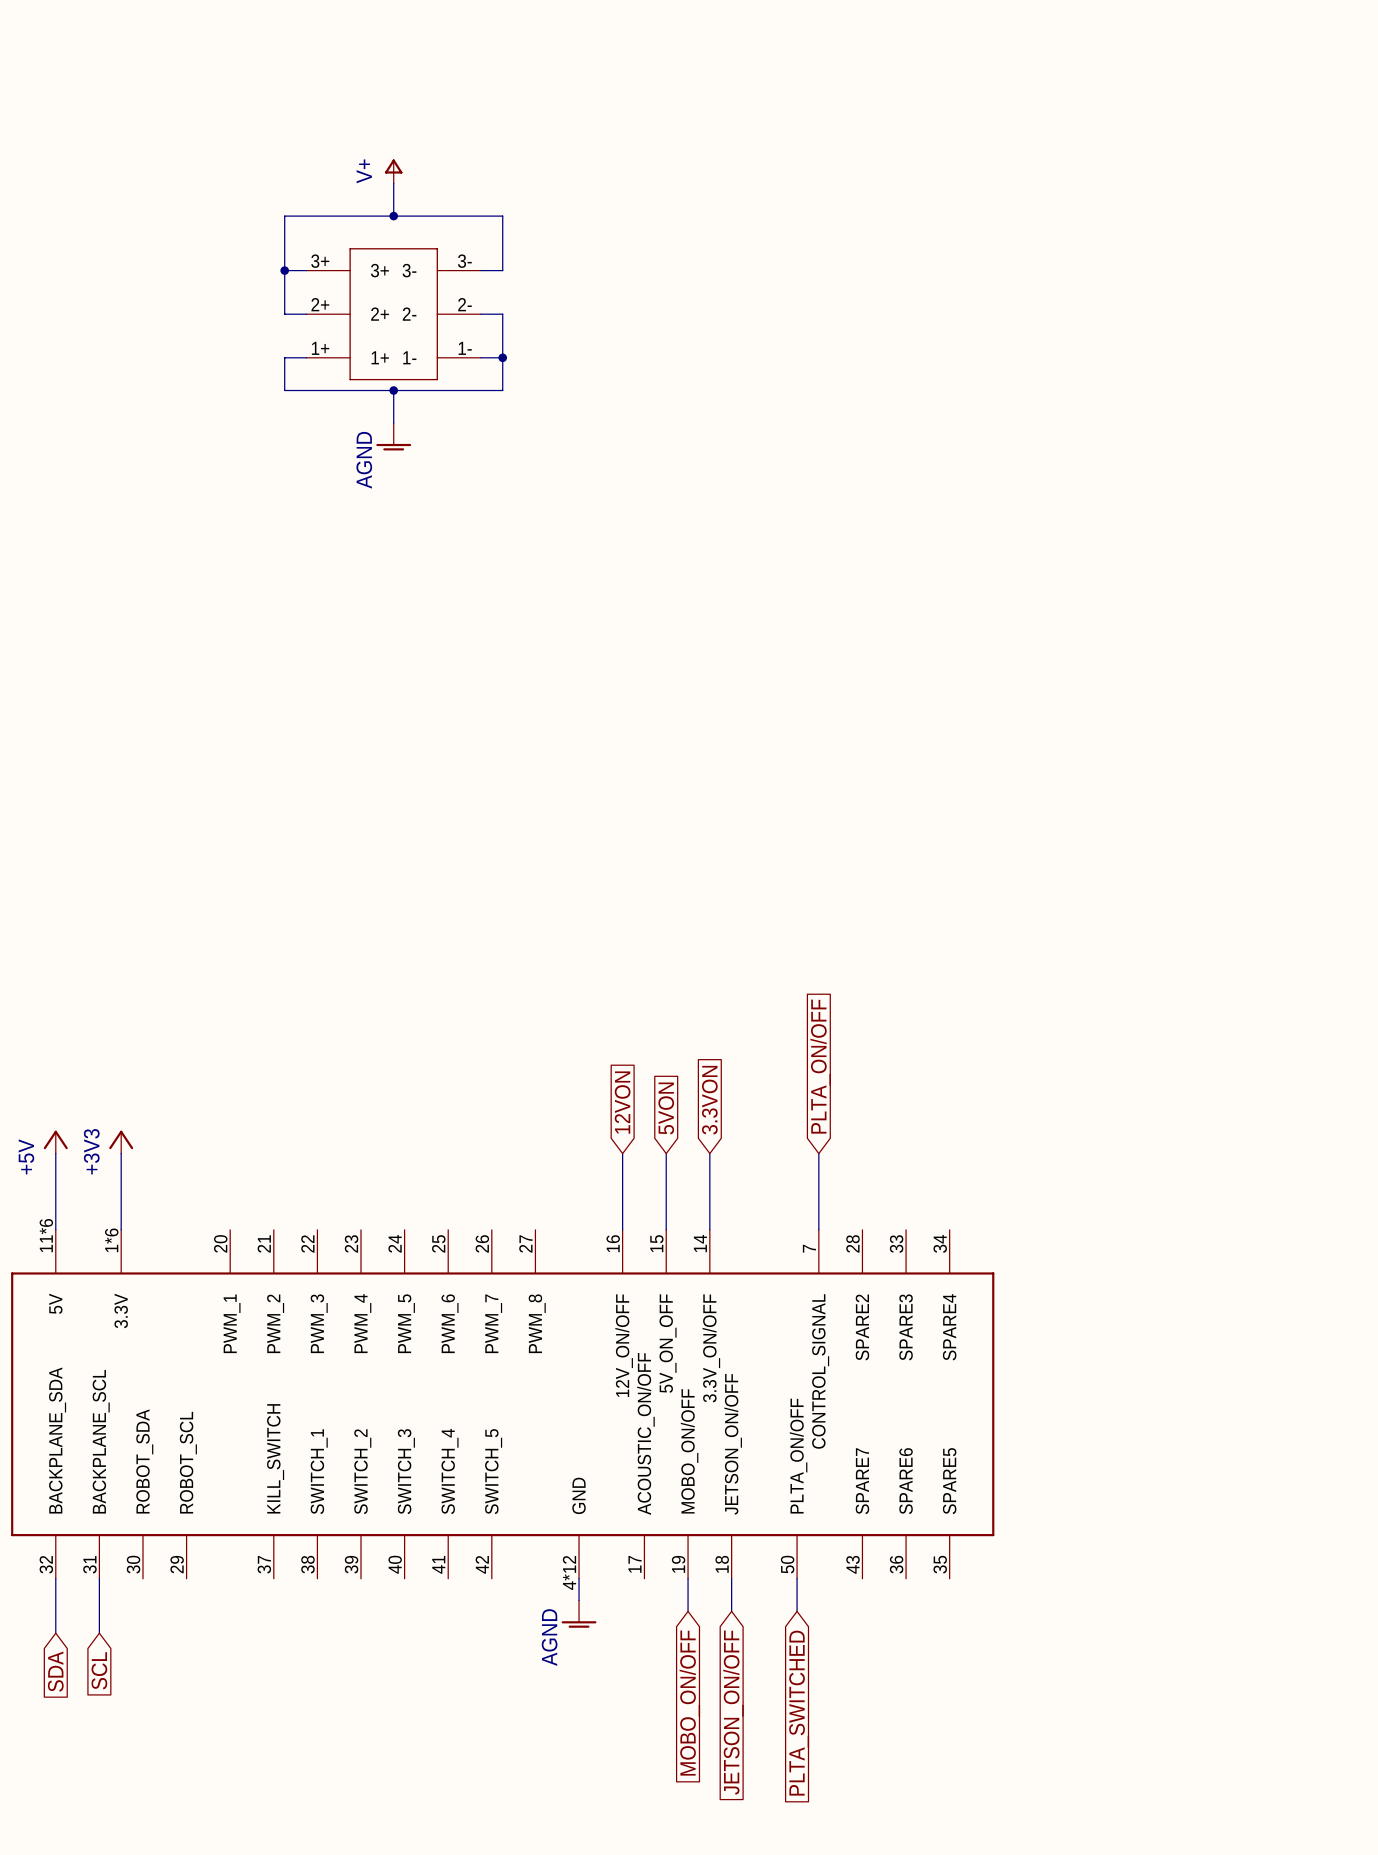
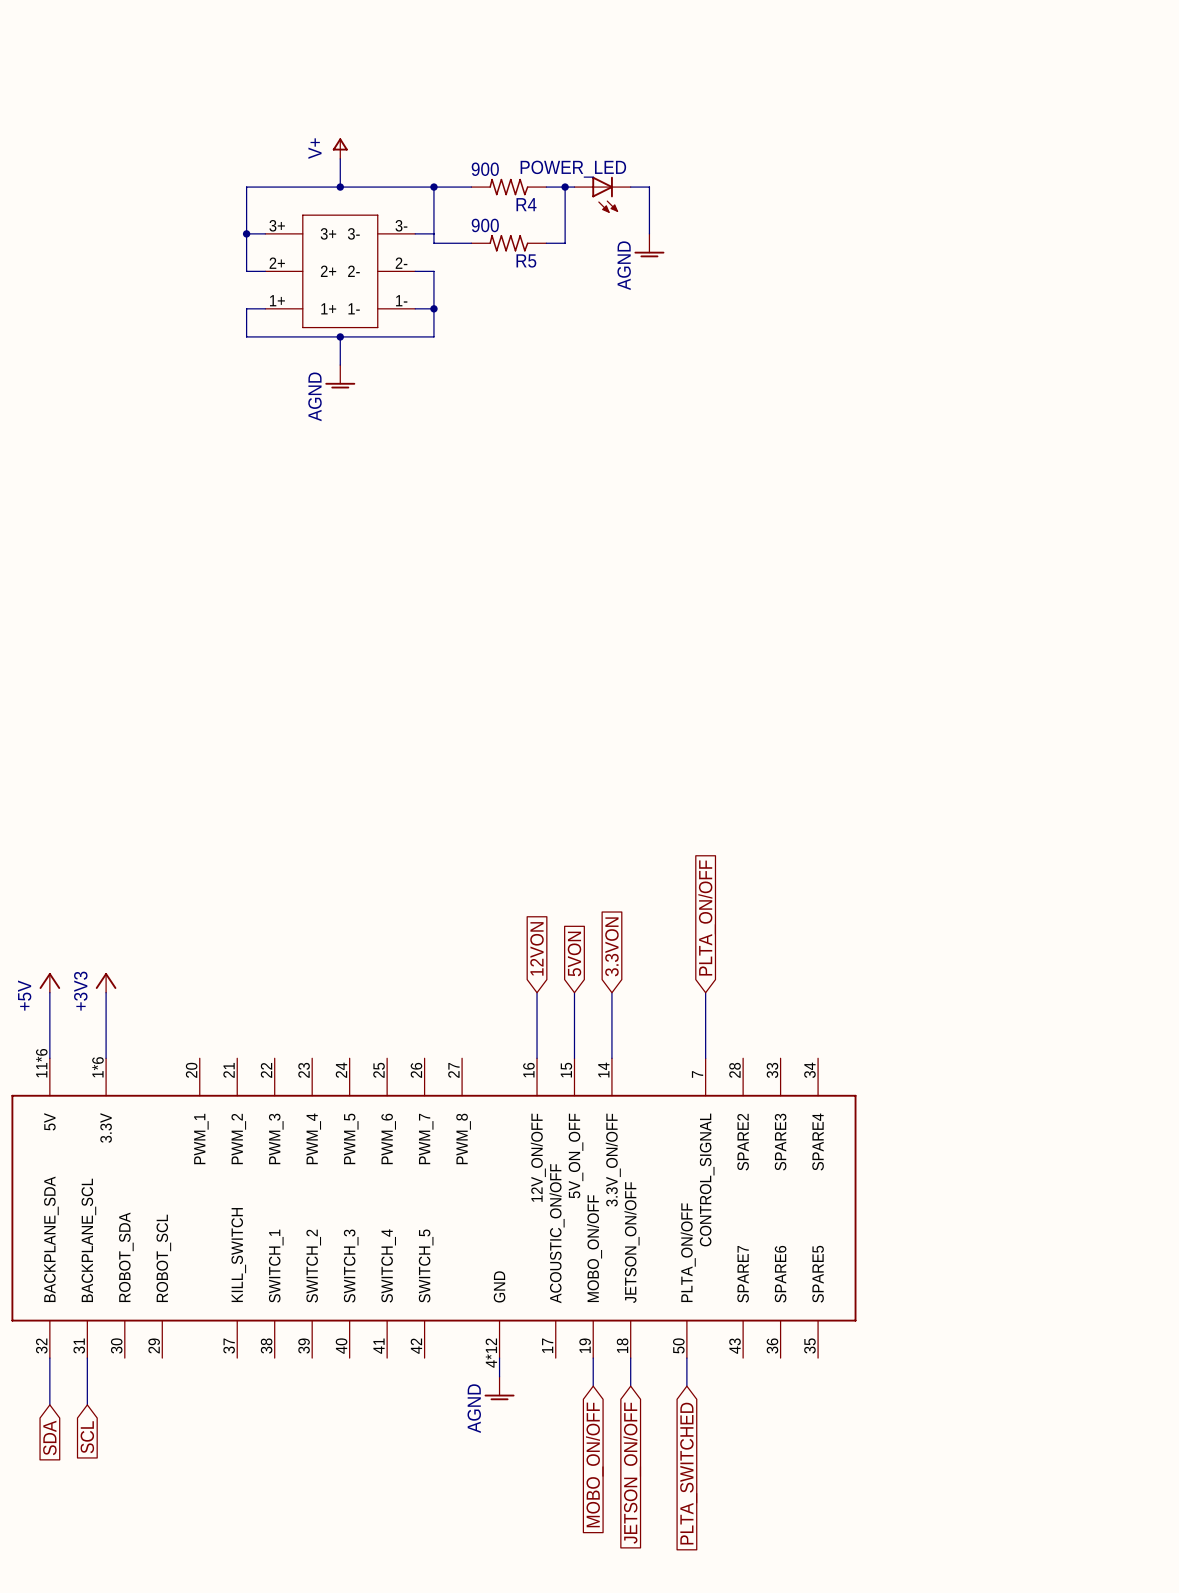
wire: none -> (433, 187) (471, 187)
junction: none -> (433, 187)
R4: none -> 900 (508, 187)
wire: none -> (546, 187) (574, 187)
wire: none -> (565, 187) (565, 243) (546, 243)
junction: none -> (565, 187)
wire: none -> (630, 187) (649, 187) (649, 233)
POWER_LED: none -> (602, 194)
wire: none -> (433, 233) (433, 243) (471, 243)
R5: none -> 900 (508, 243)
power symbol: none -> AGND (649, 245)

